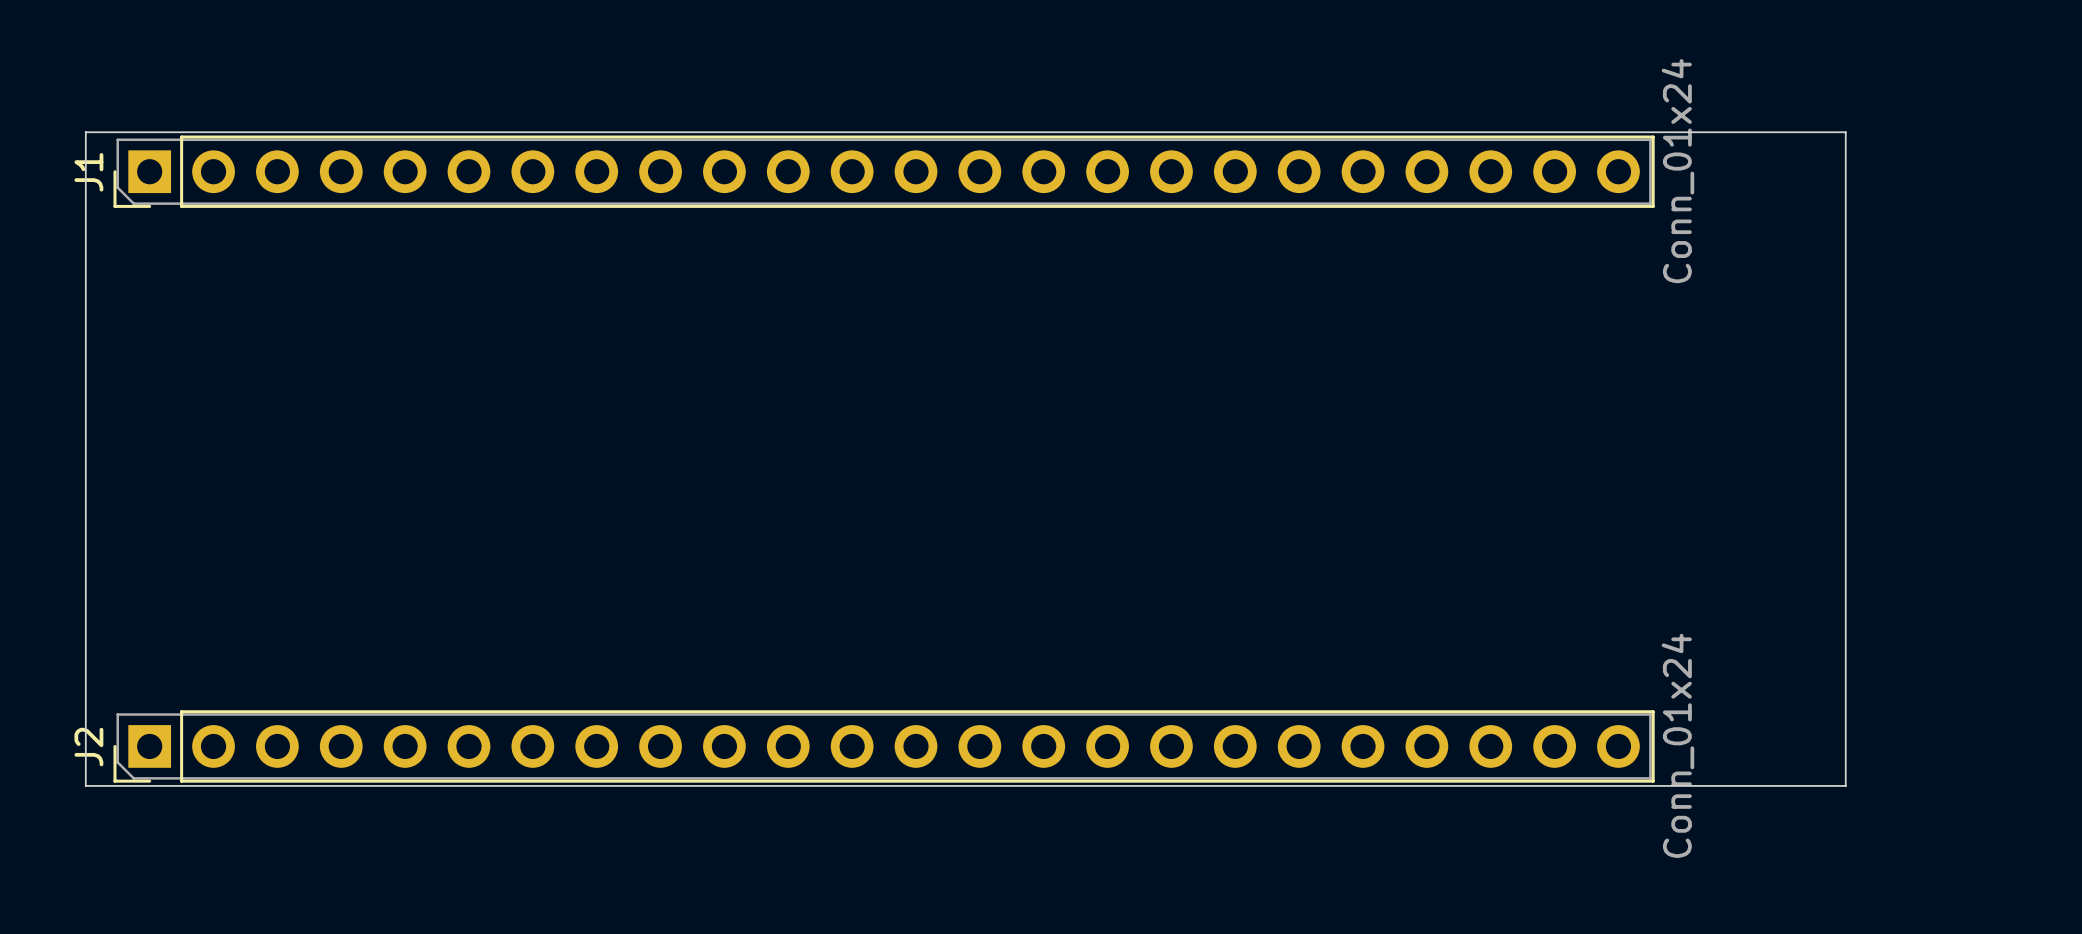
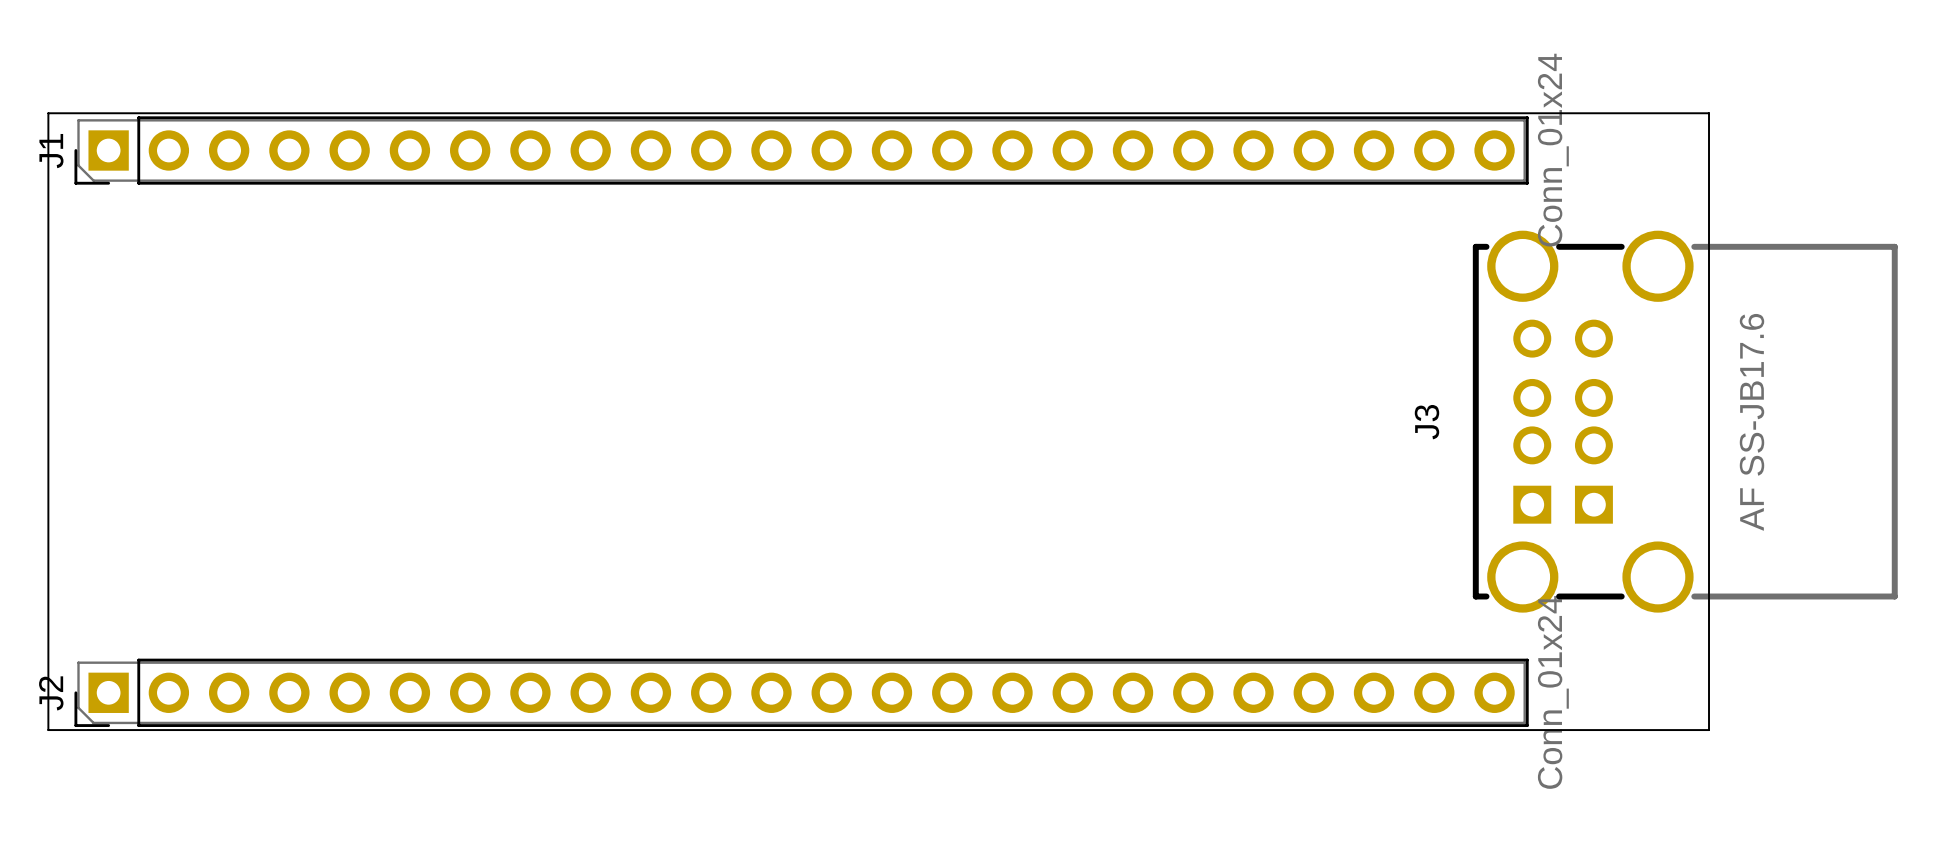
J3: none -> AF SS-JB17.6 (1685, 421)

